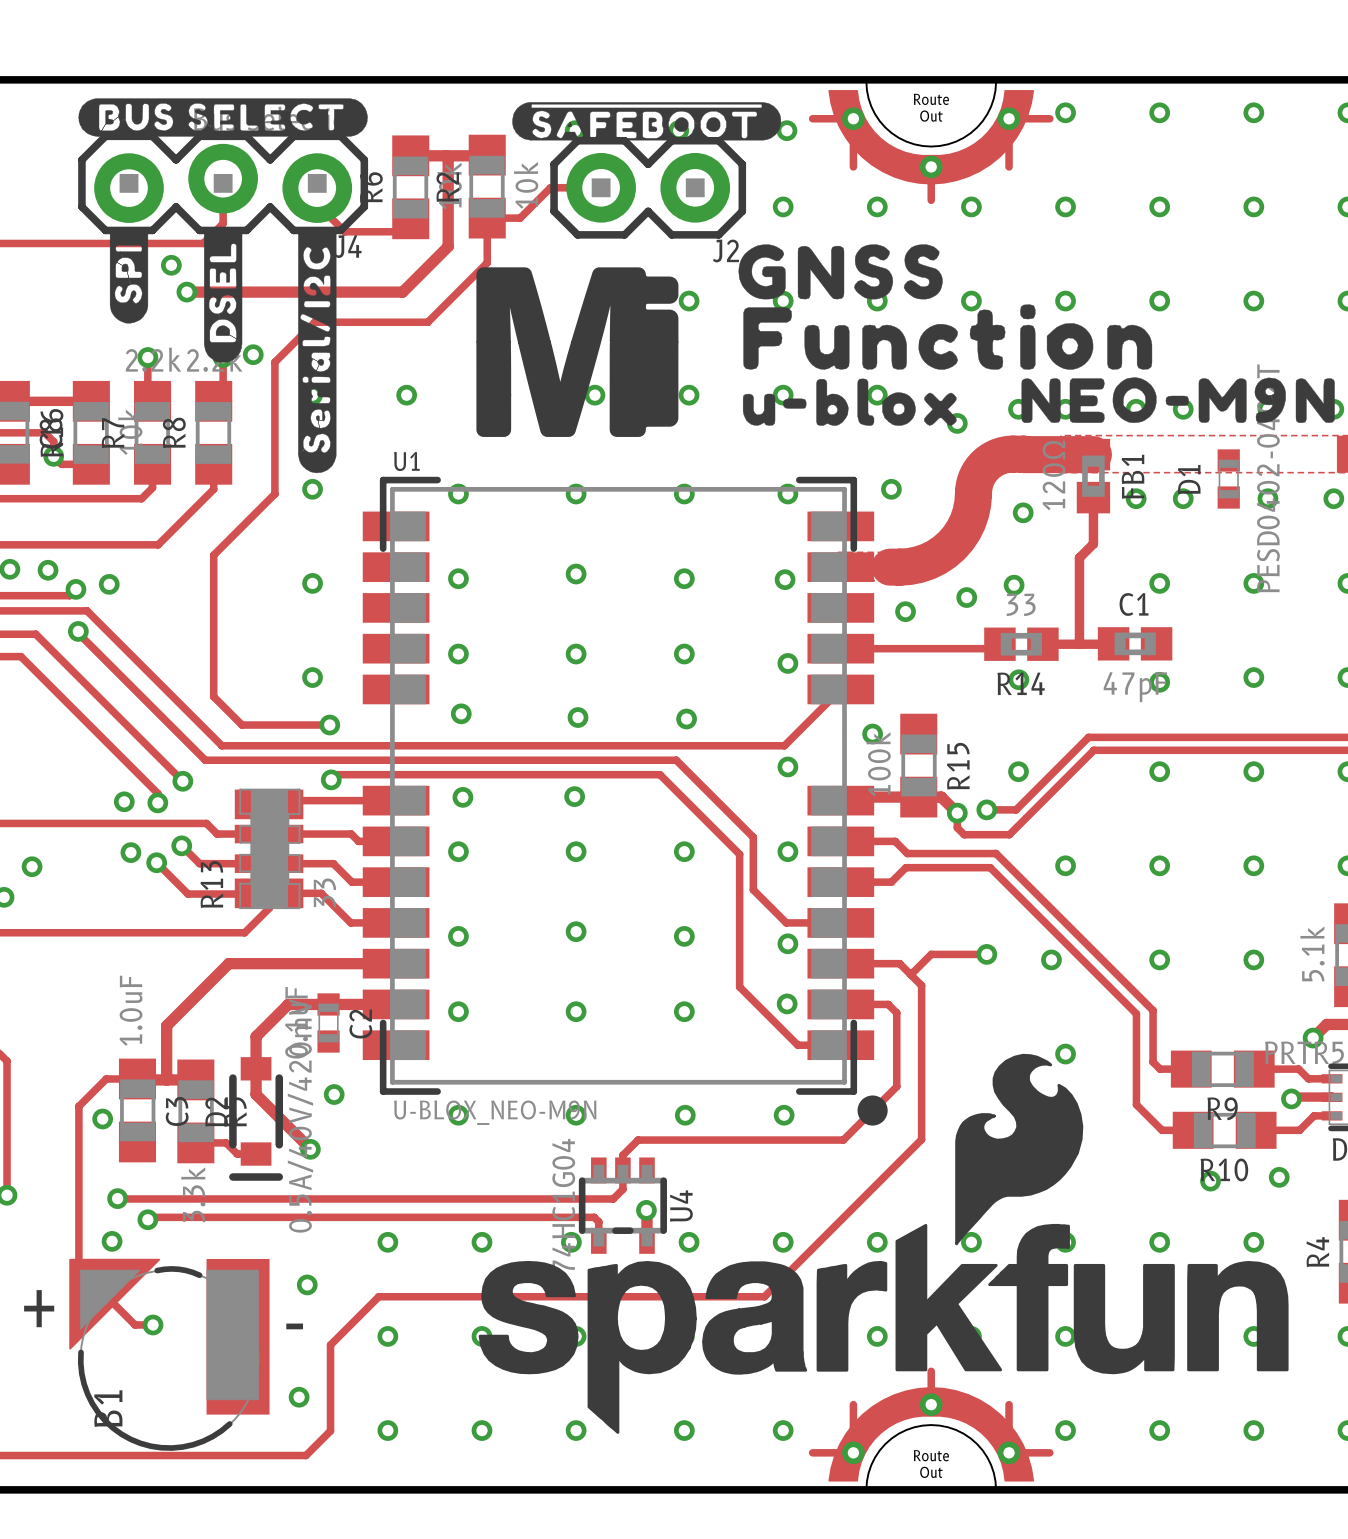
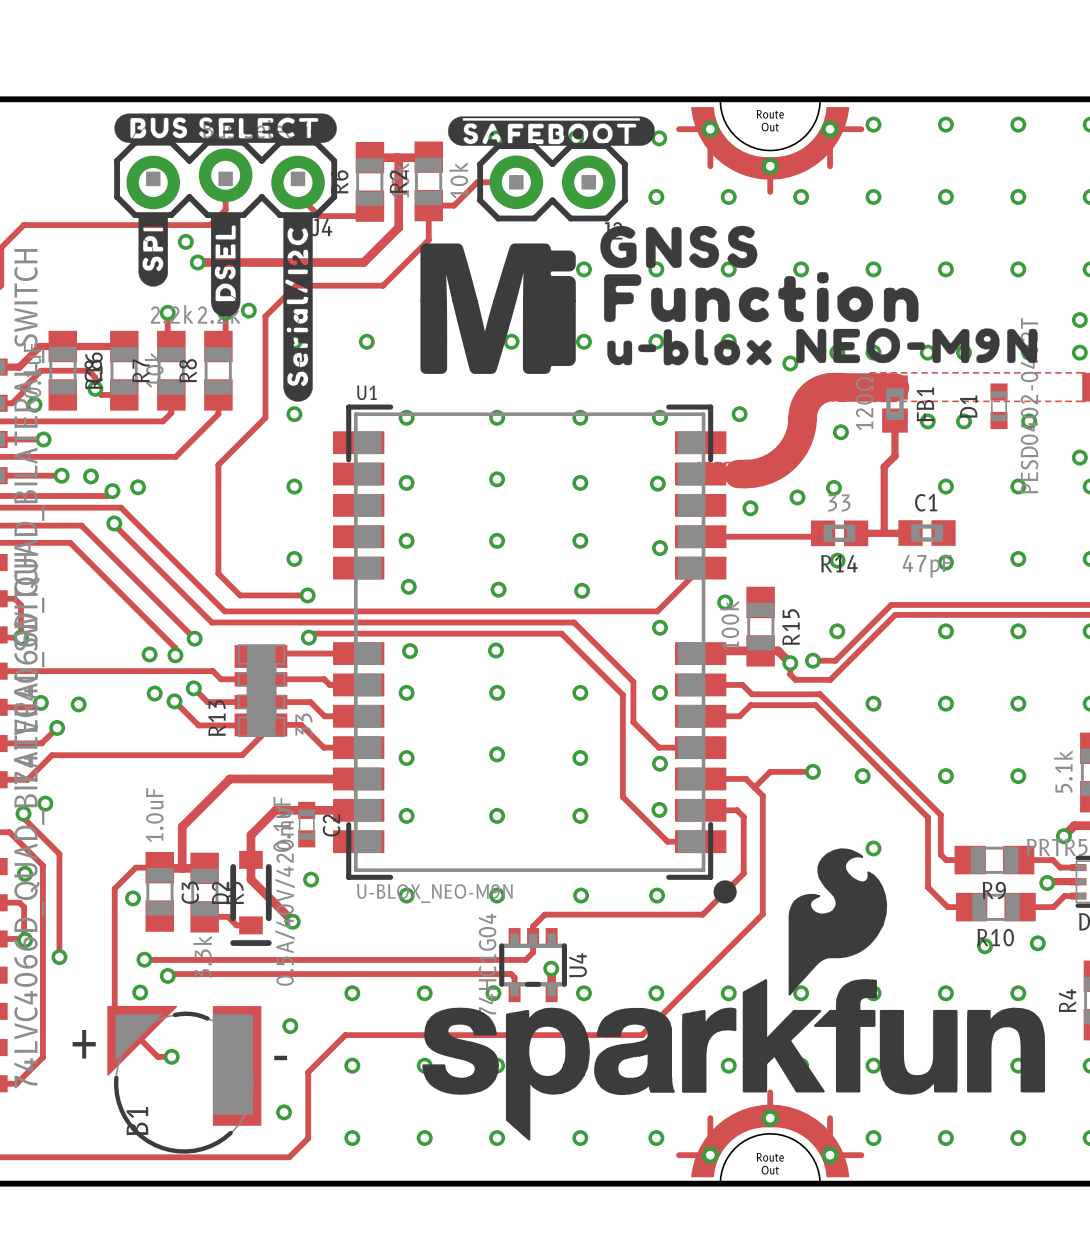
drawing position: (840, 271) -> (678, 246)
drawing position: (947, 337) -> (761, 297)
via: none -> (1079, 320)
drawing position: (1178, 400) -> (916, 345)
drawing position: (849, 402) -> (689, 347)
via: (1333, 498) -> none
via: none -> (1079, 457)

